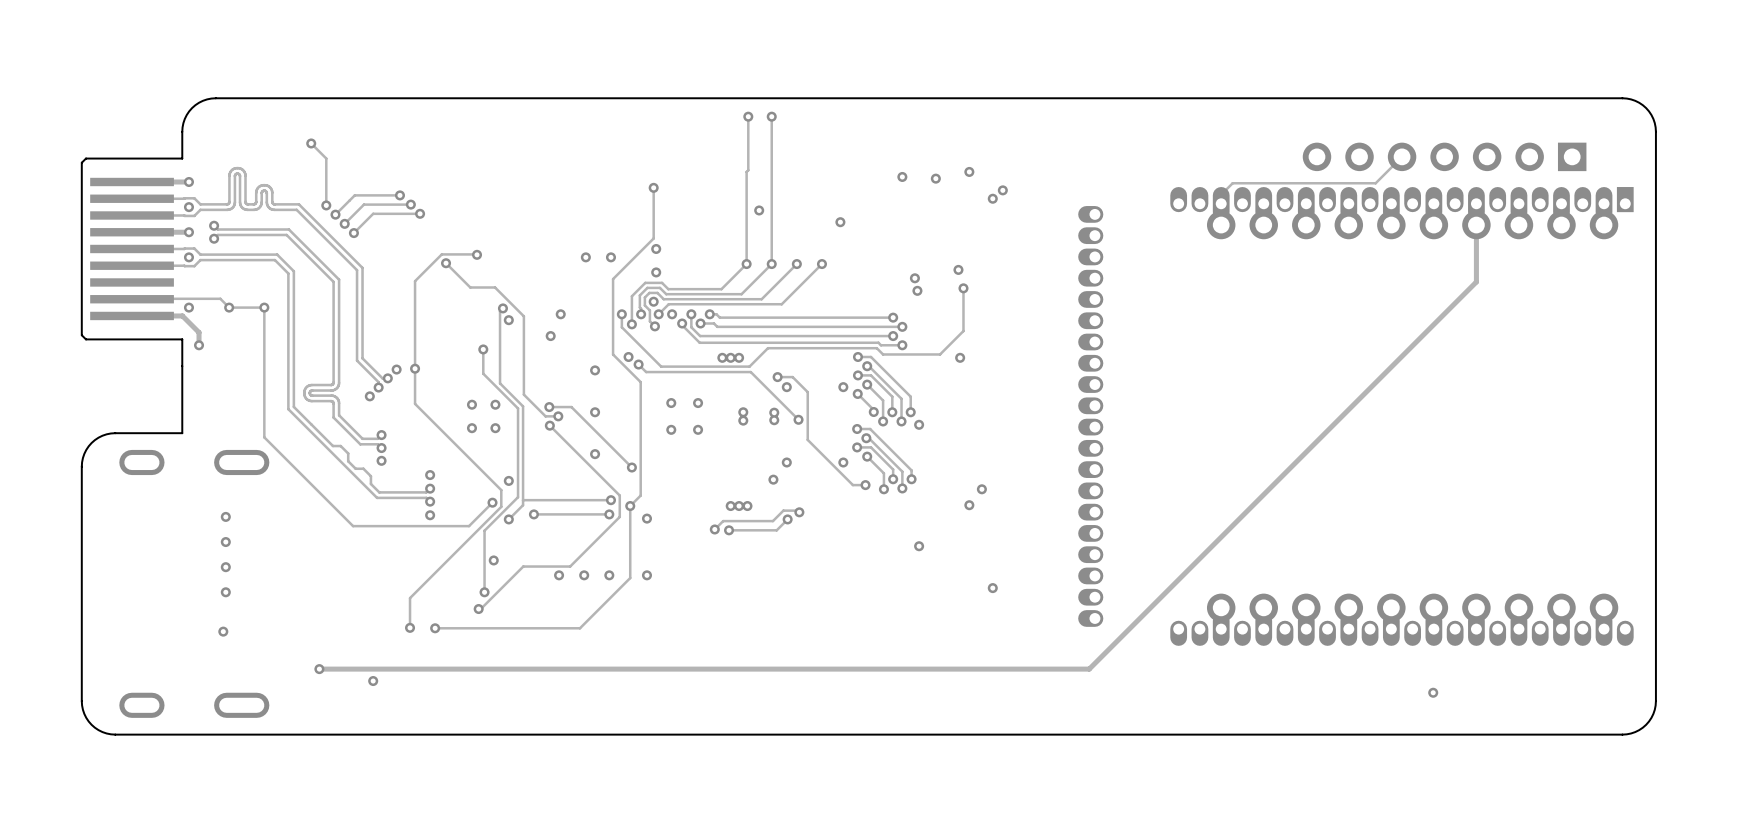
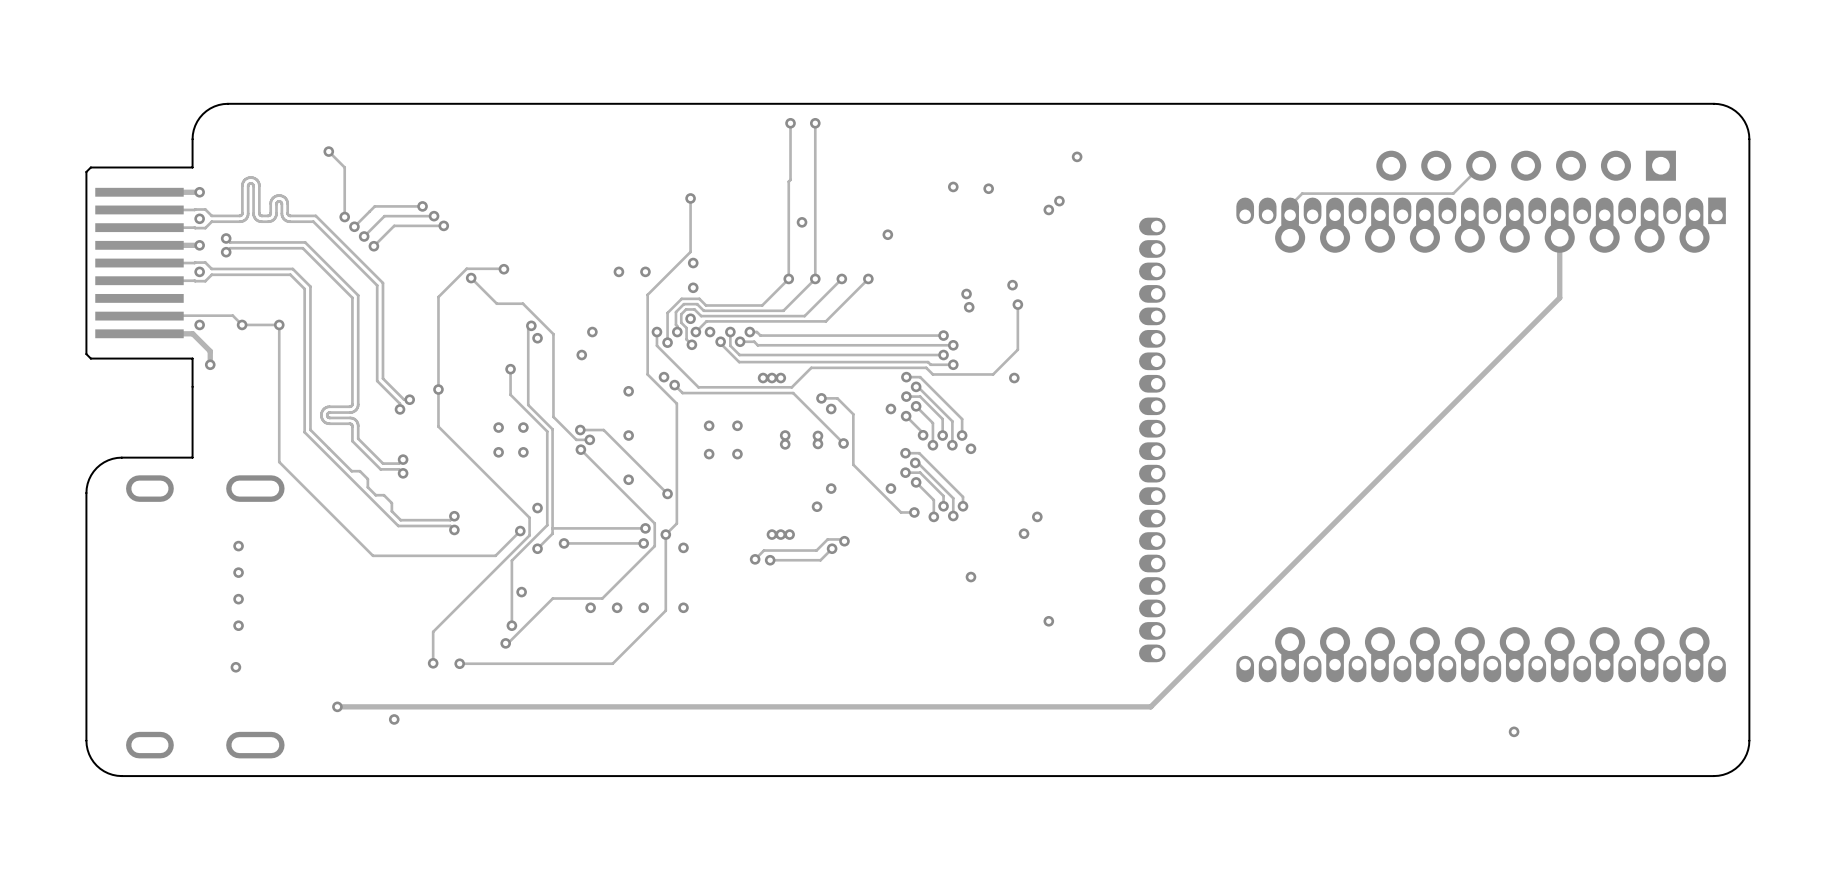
via position: (969, 171) -> (1077, 156)
via: (396, 369) -> none
via: (369, 396) -> none
via: (381, 460) -> none
via: (430, 475) -> none
via: (430, 515) -> none

